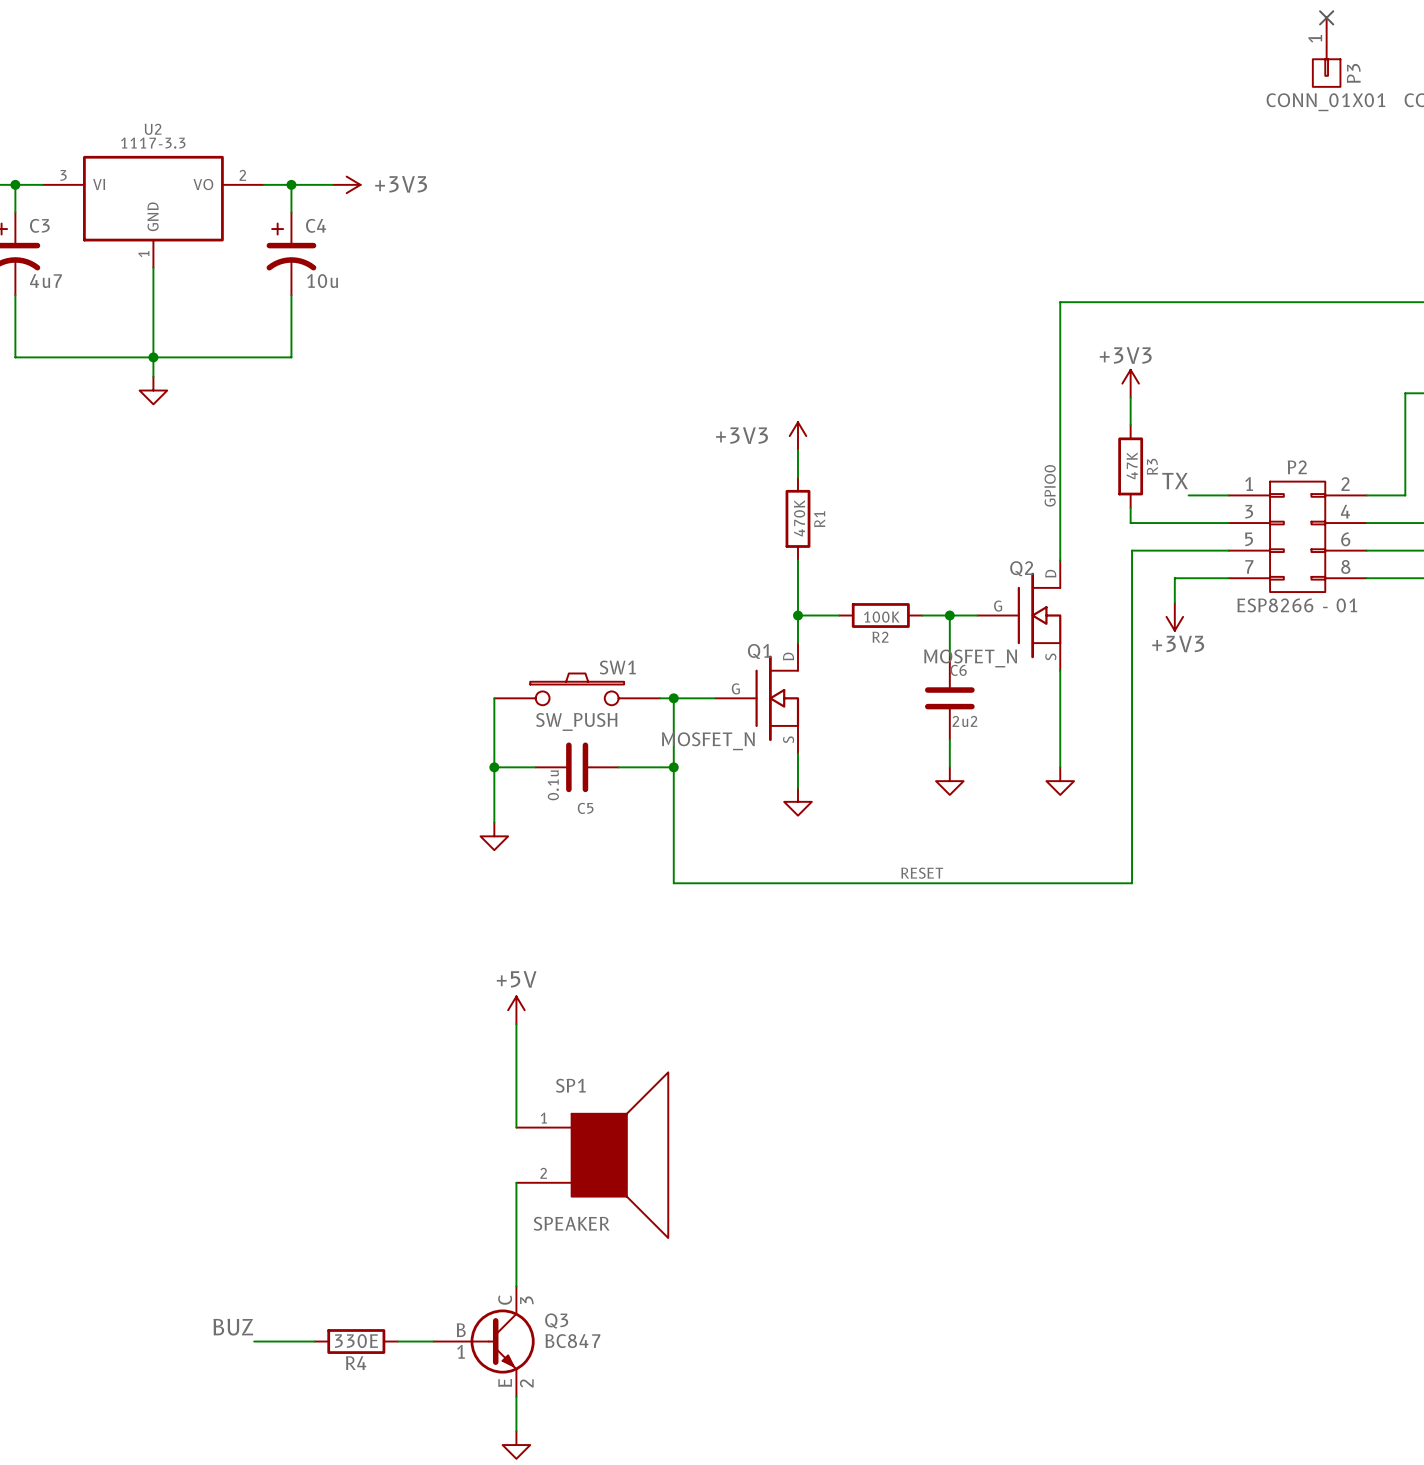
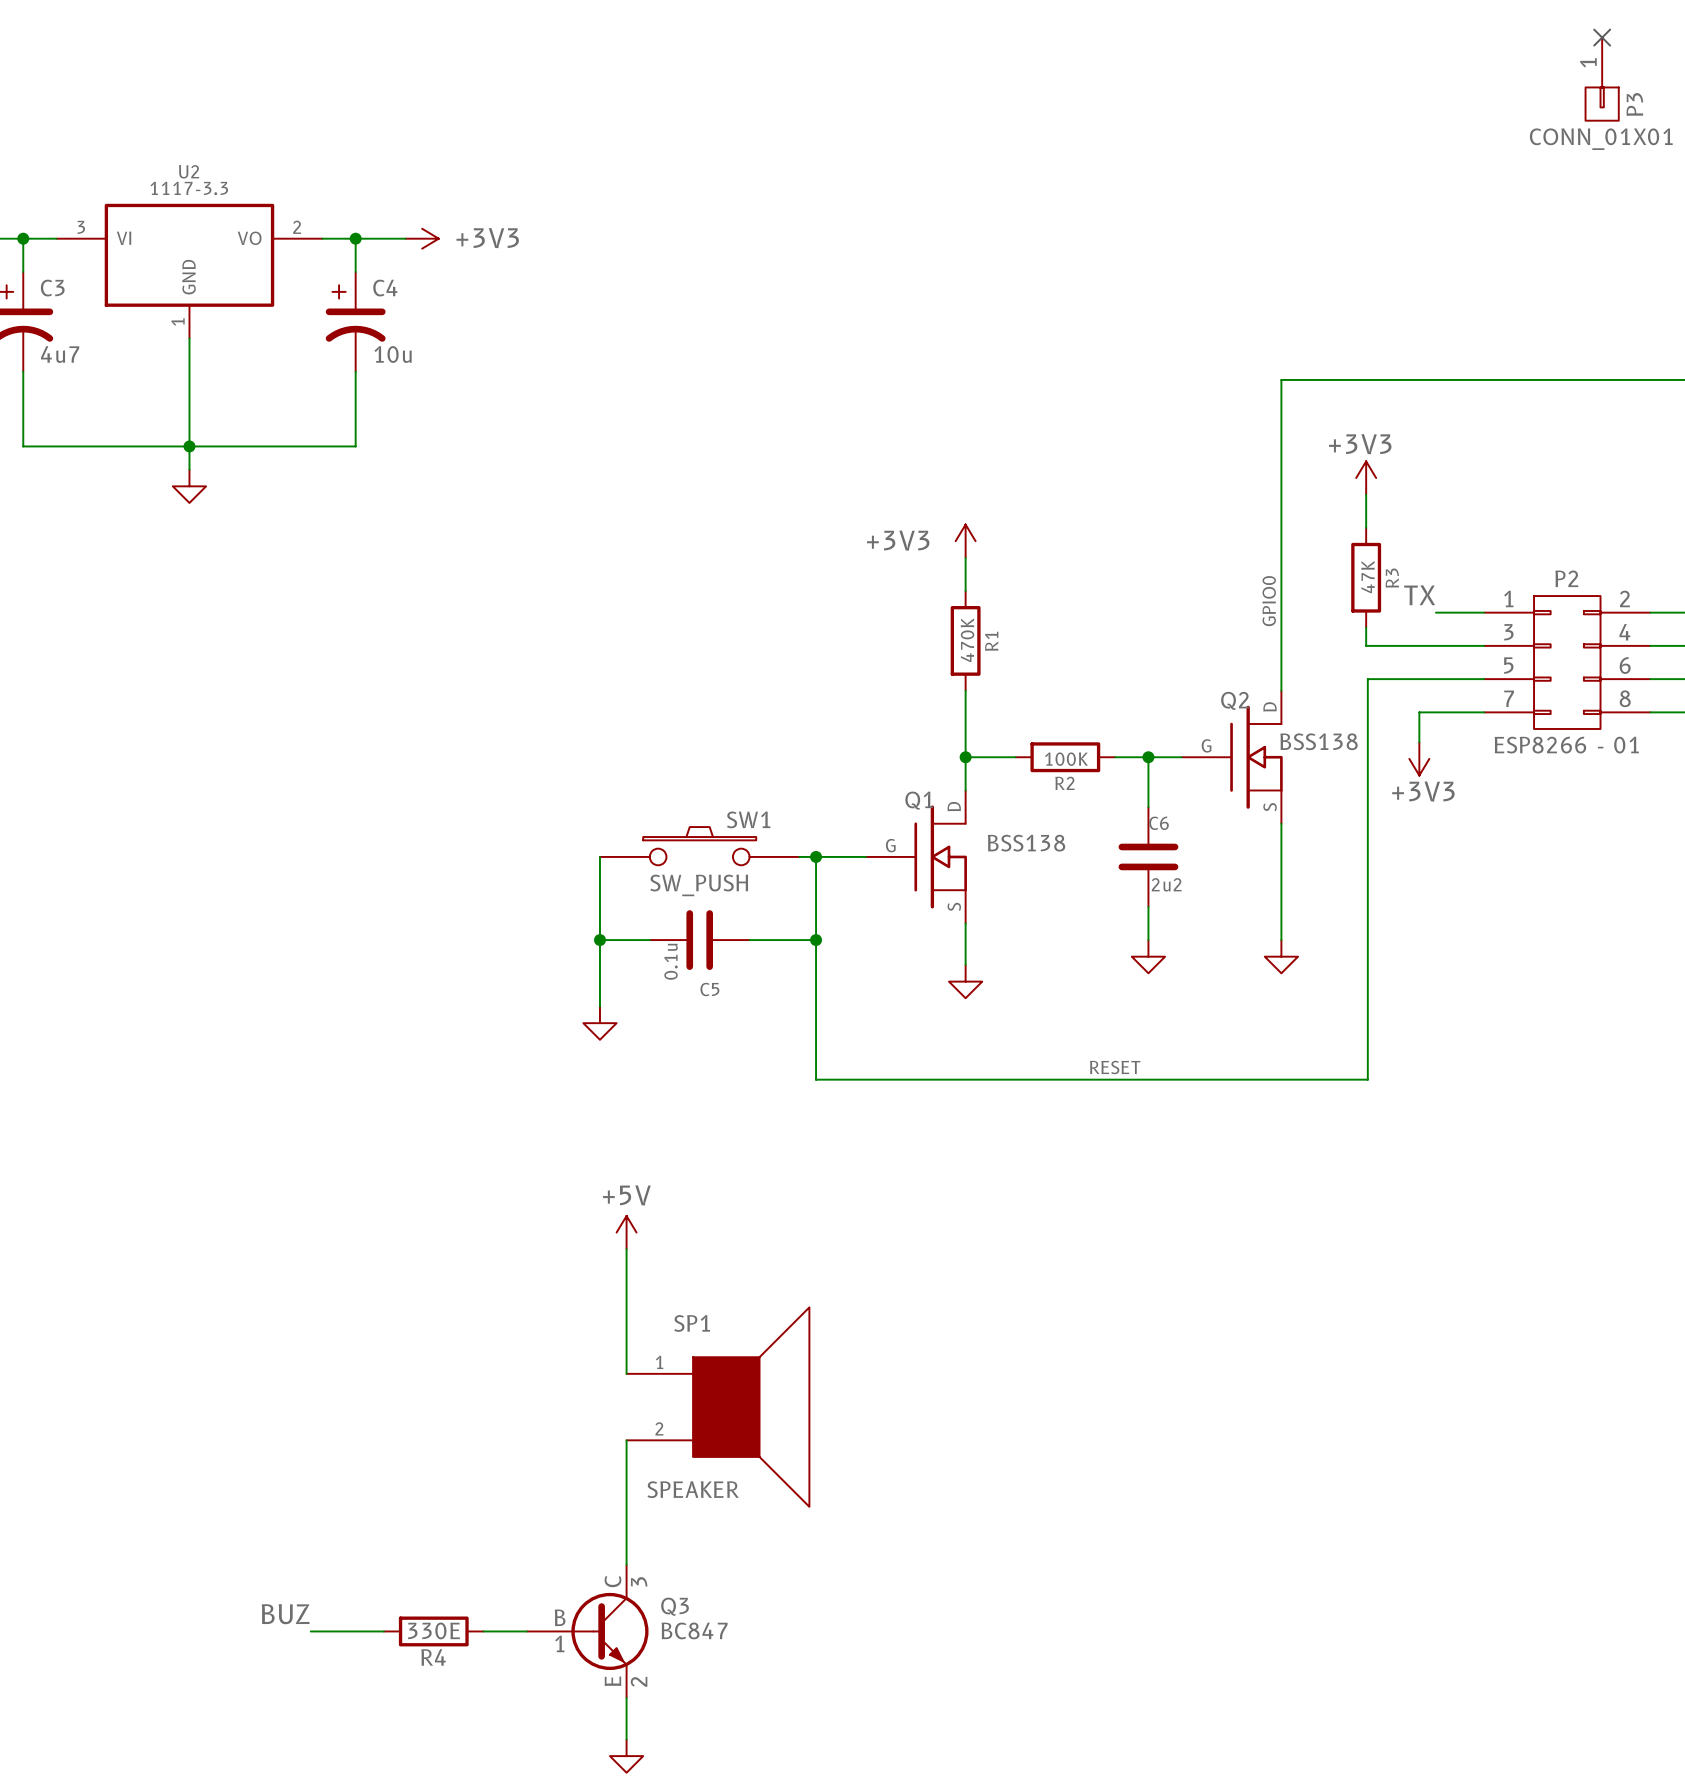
Q2 value: MOSFET_N (970, 658) -> BSS138 (1319, 741)
Q1 value: MOSFET_N (708, 741) -> BSS138 (1026, 843)

